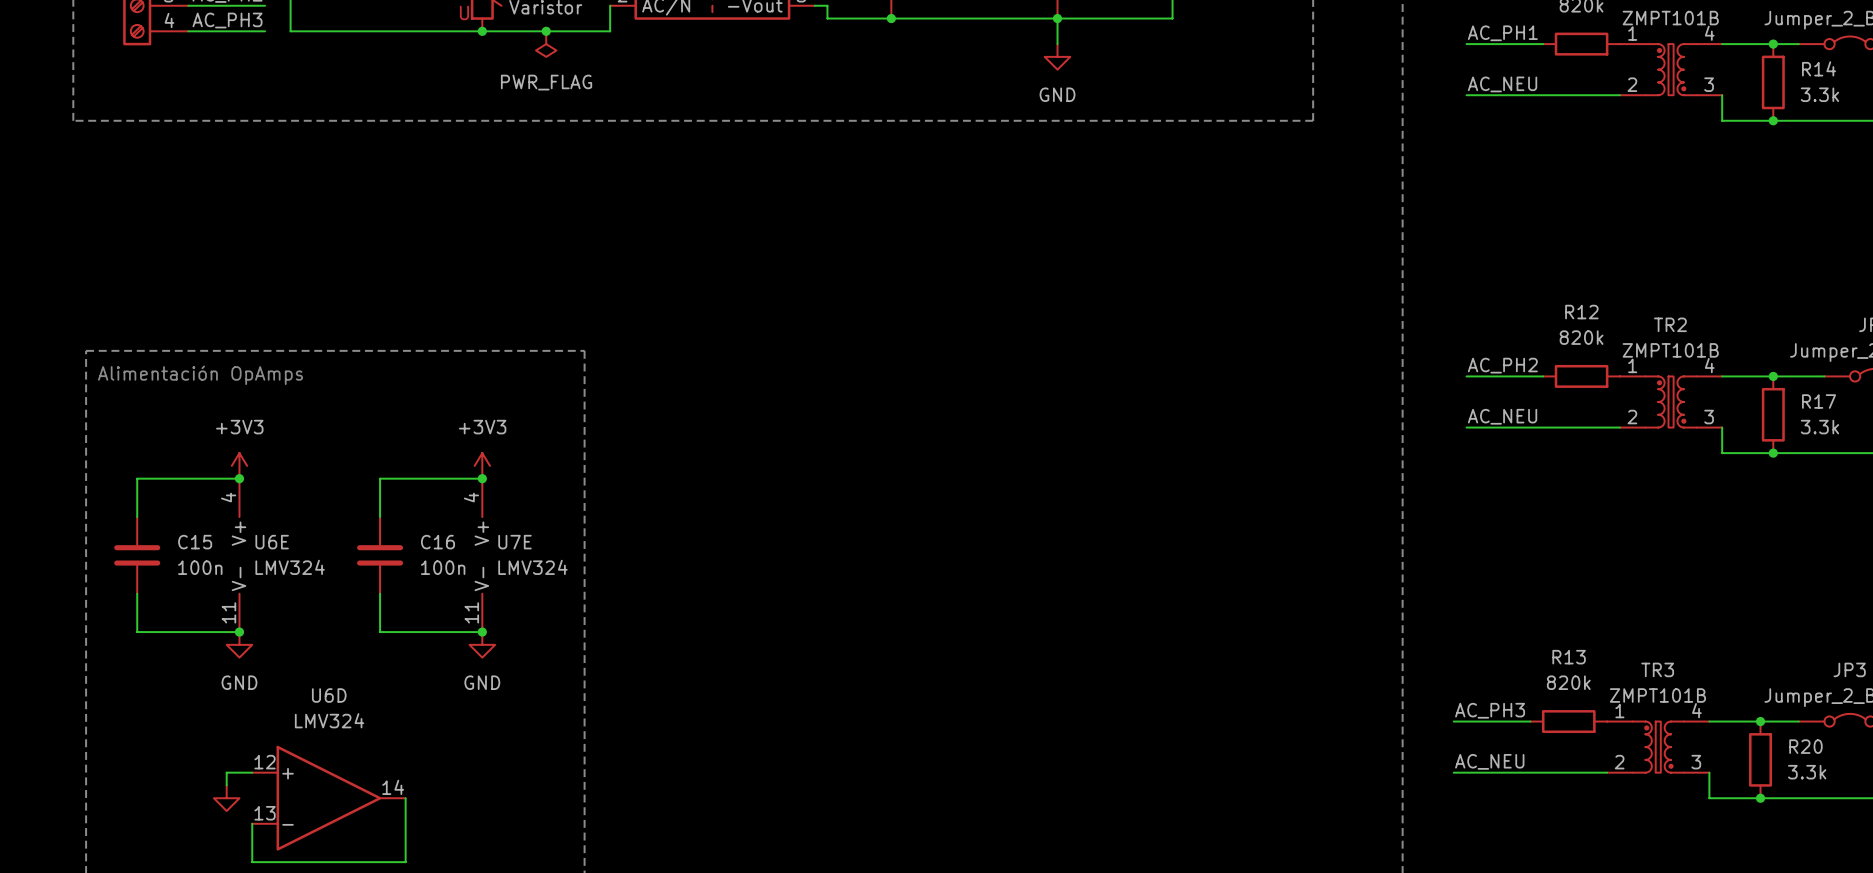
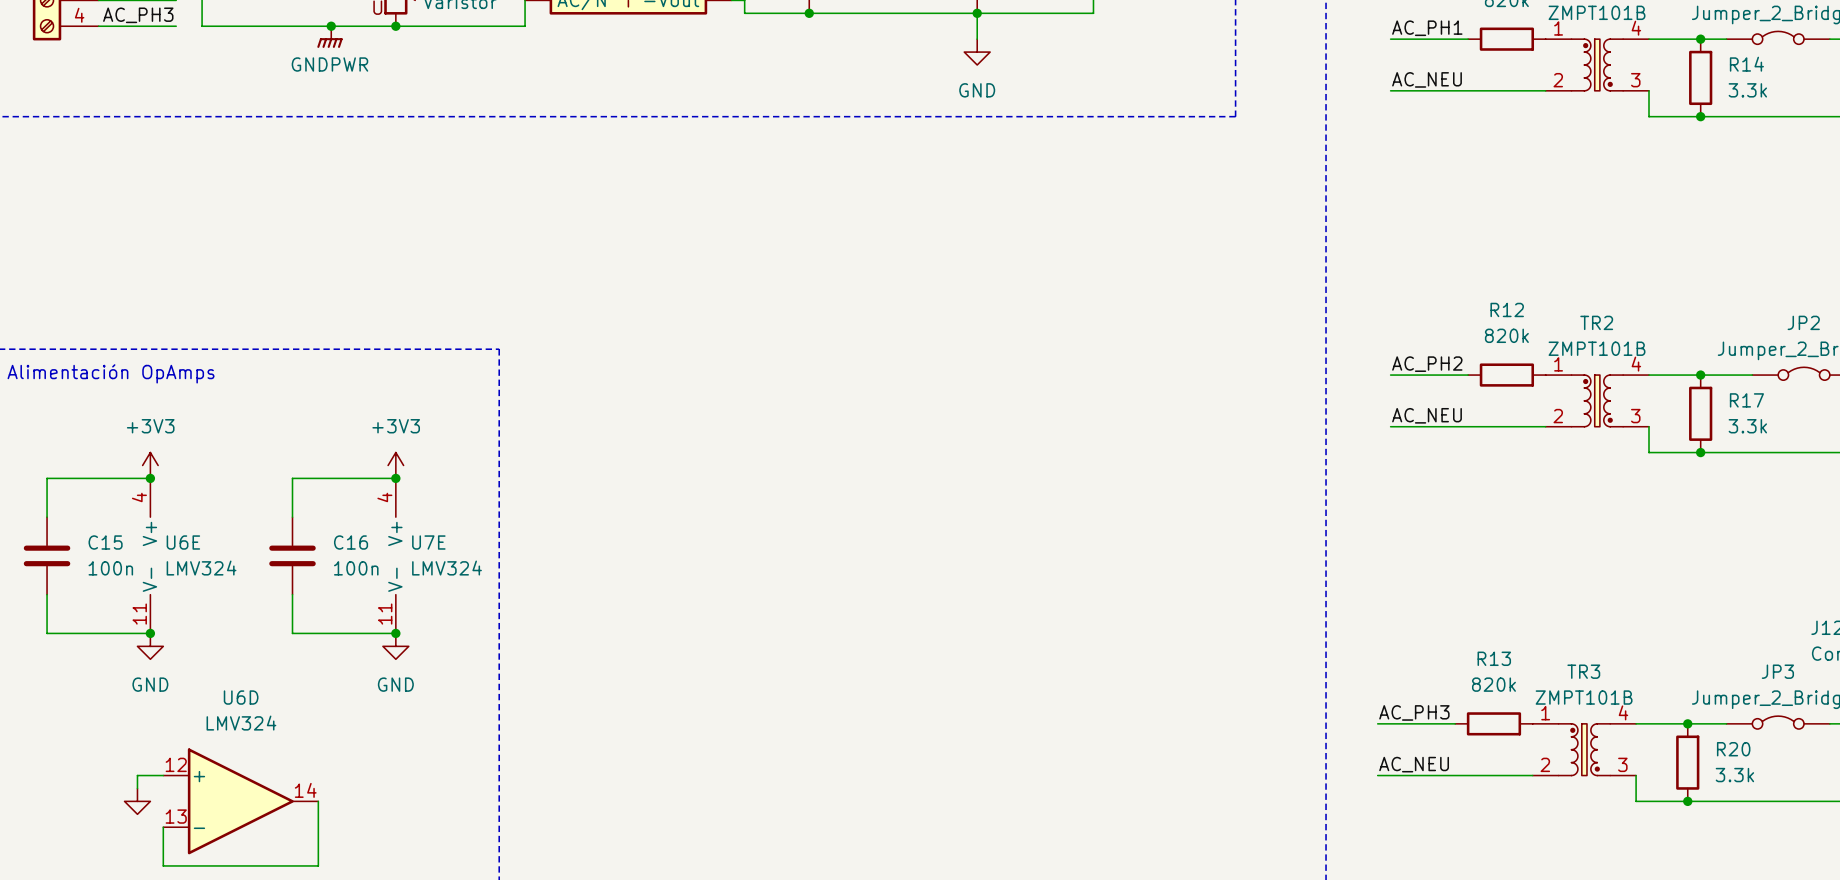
junction: none -> (331, 26)
junction: (546, 31) -> none
power symbol: none -> GNDPWR (329, 37)
power symbol: PWR_FLAG (546, 44) -> none

